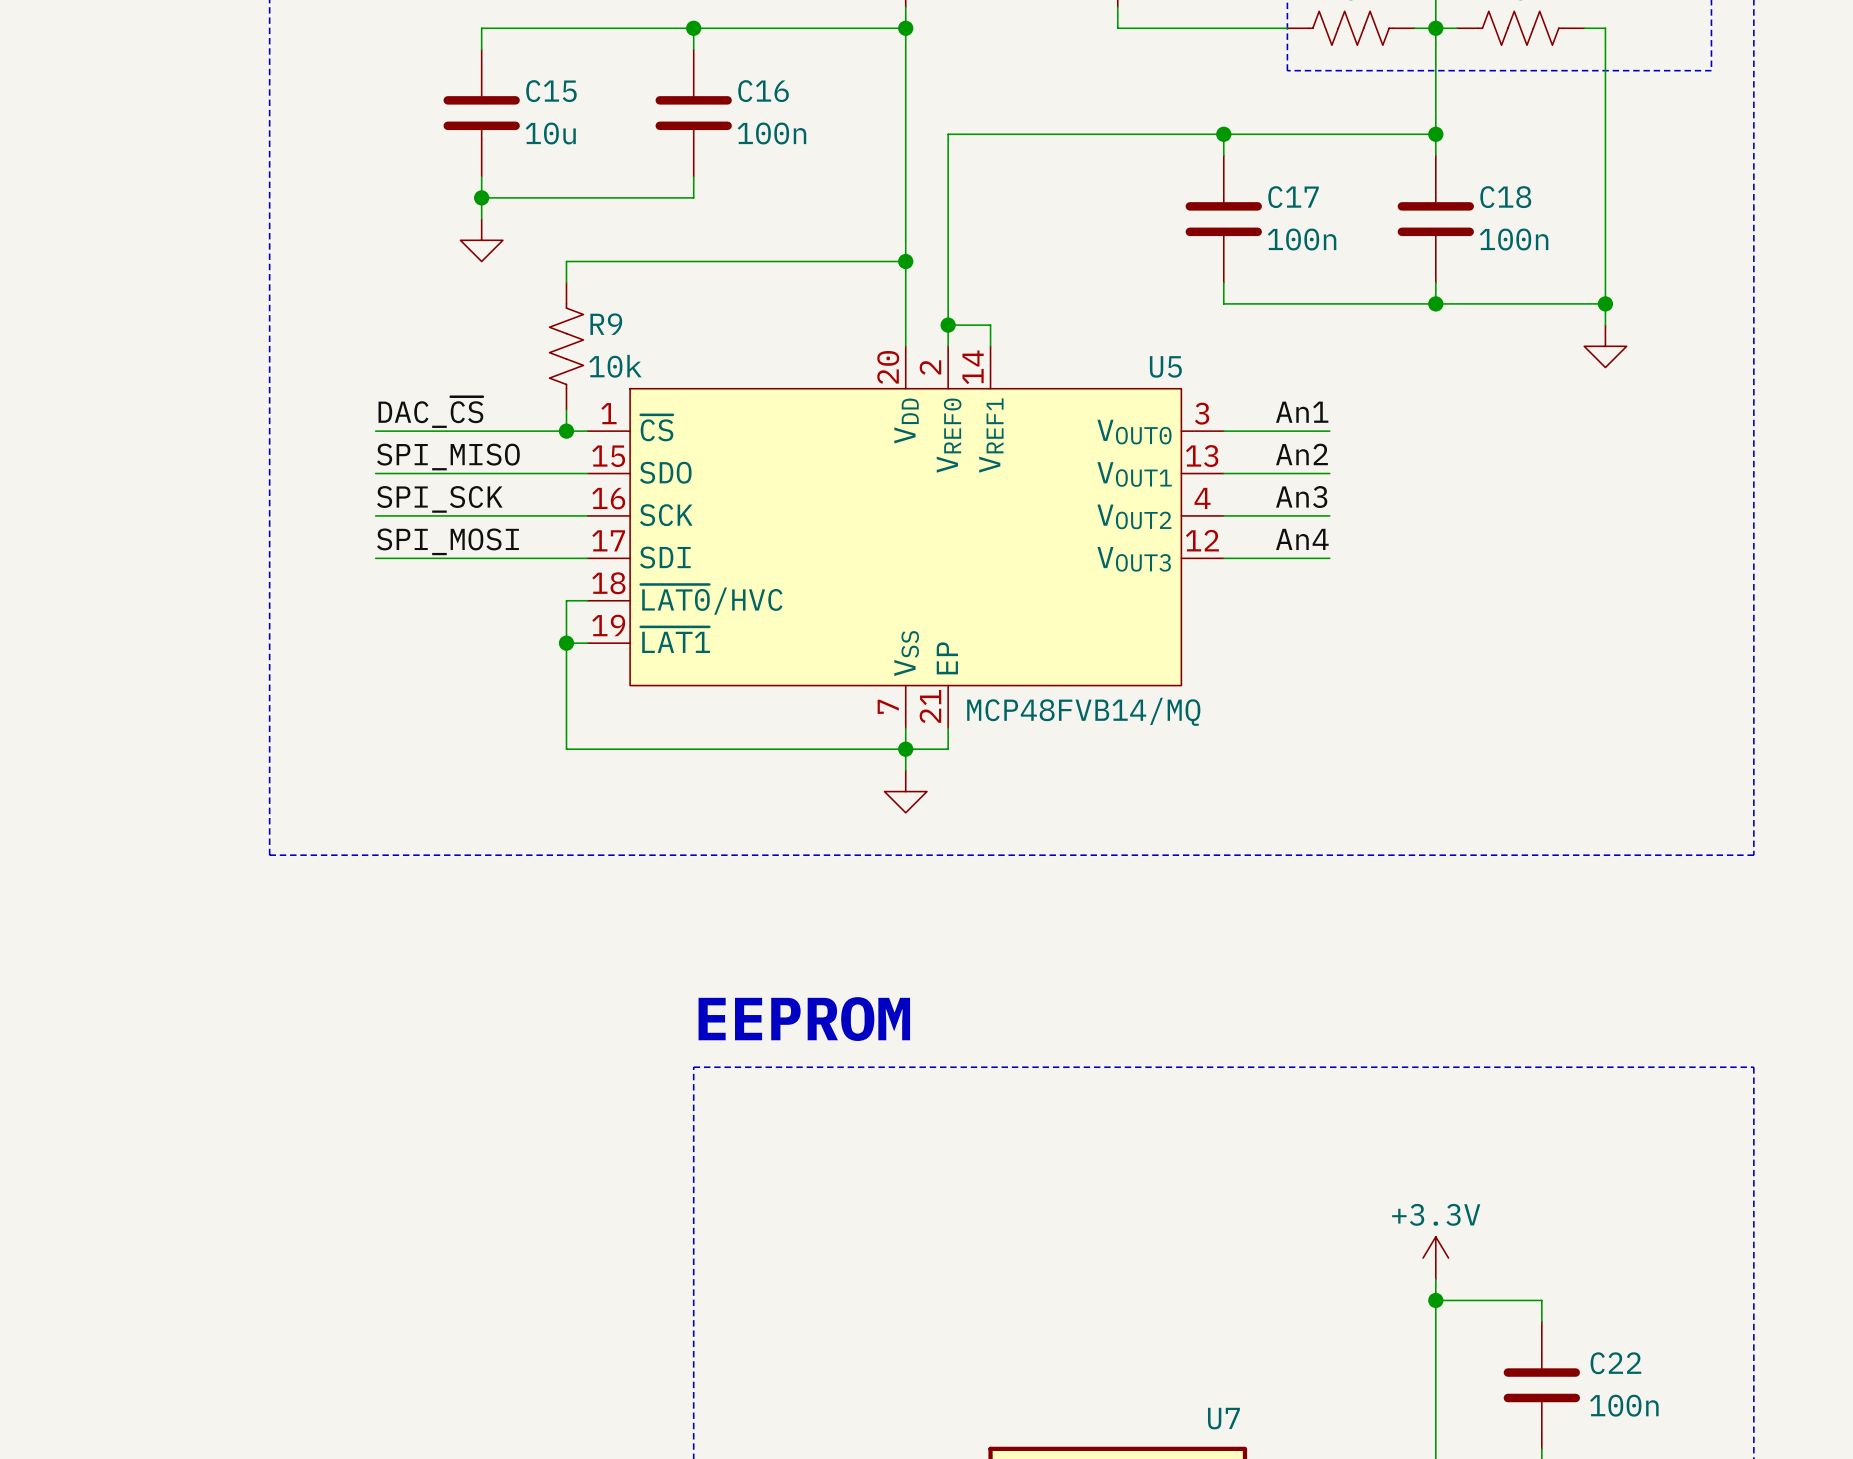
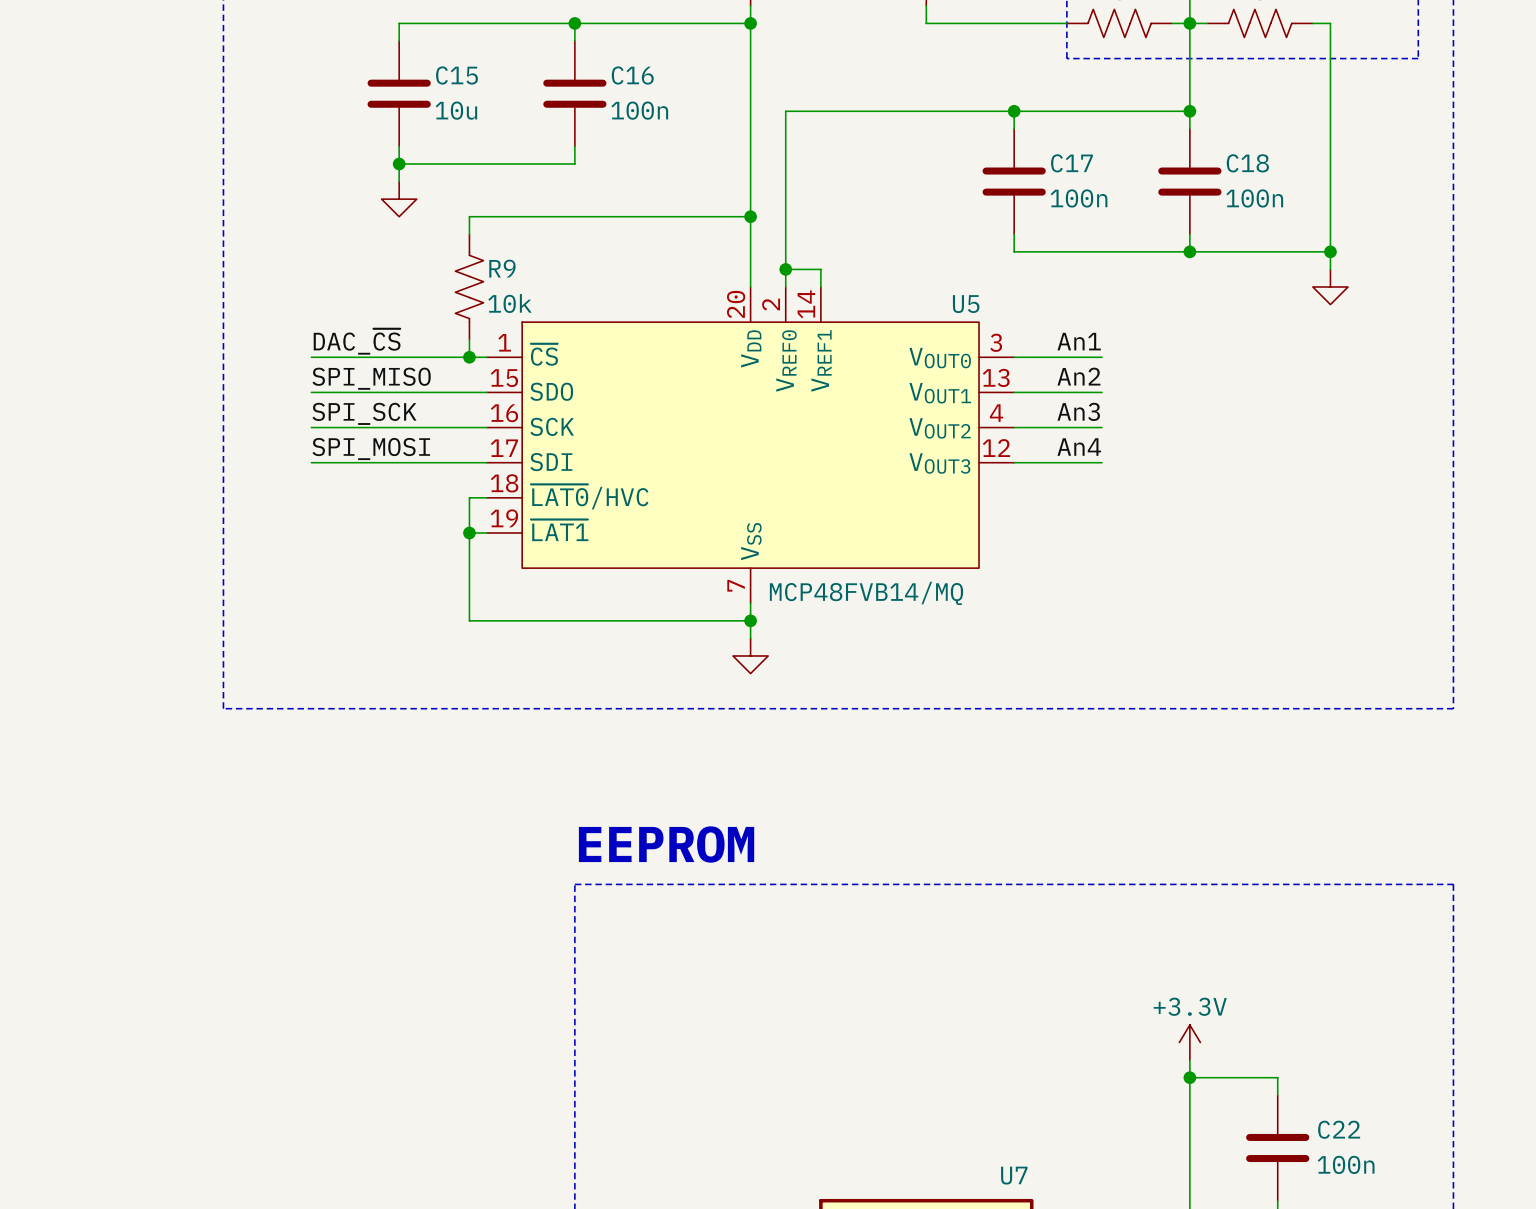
U5 symbol: [587, 346, 1224, 728] -> [487, 287, 1015, 604]
U5 value position: MCP48FVB14/MQ (1083, 711) -> MCP48FVB14/MQ (866, 593)
wire: (948, 727) (948, 749) (905, 749) -> none

